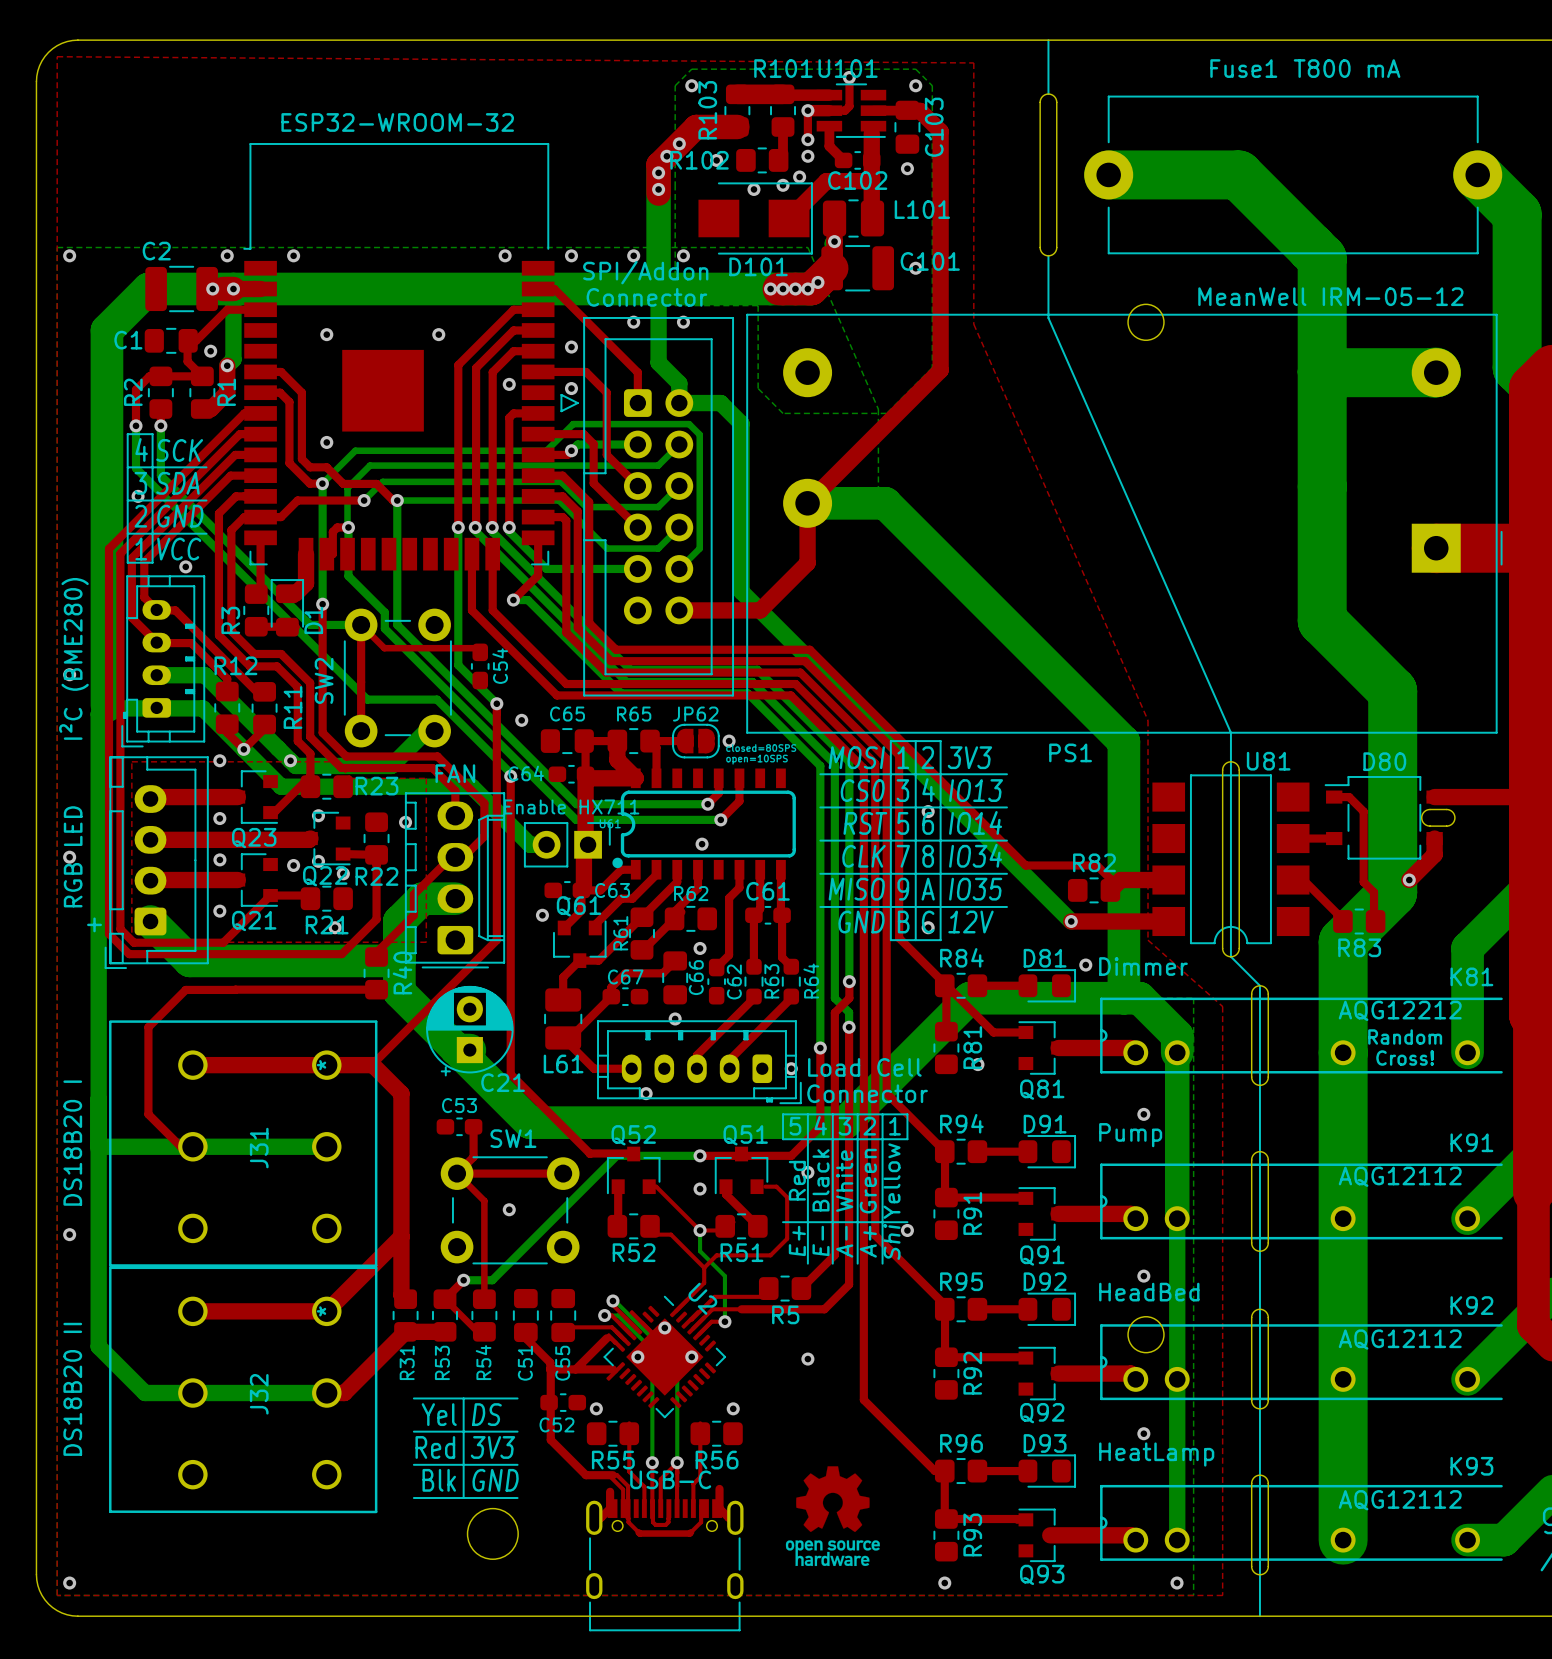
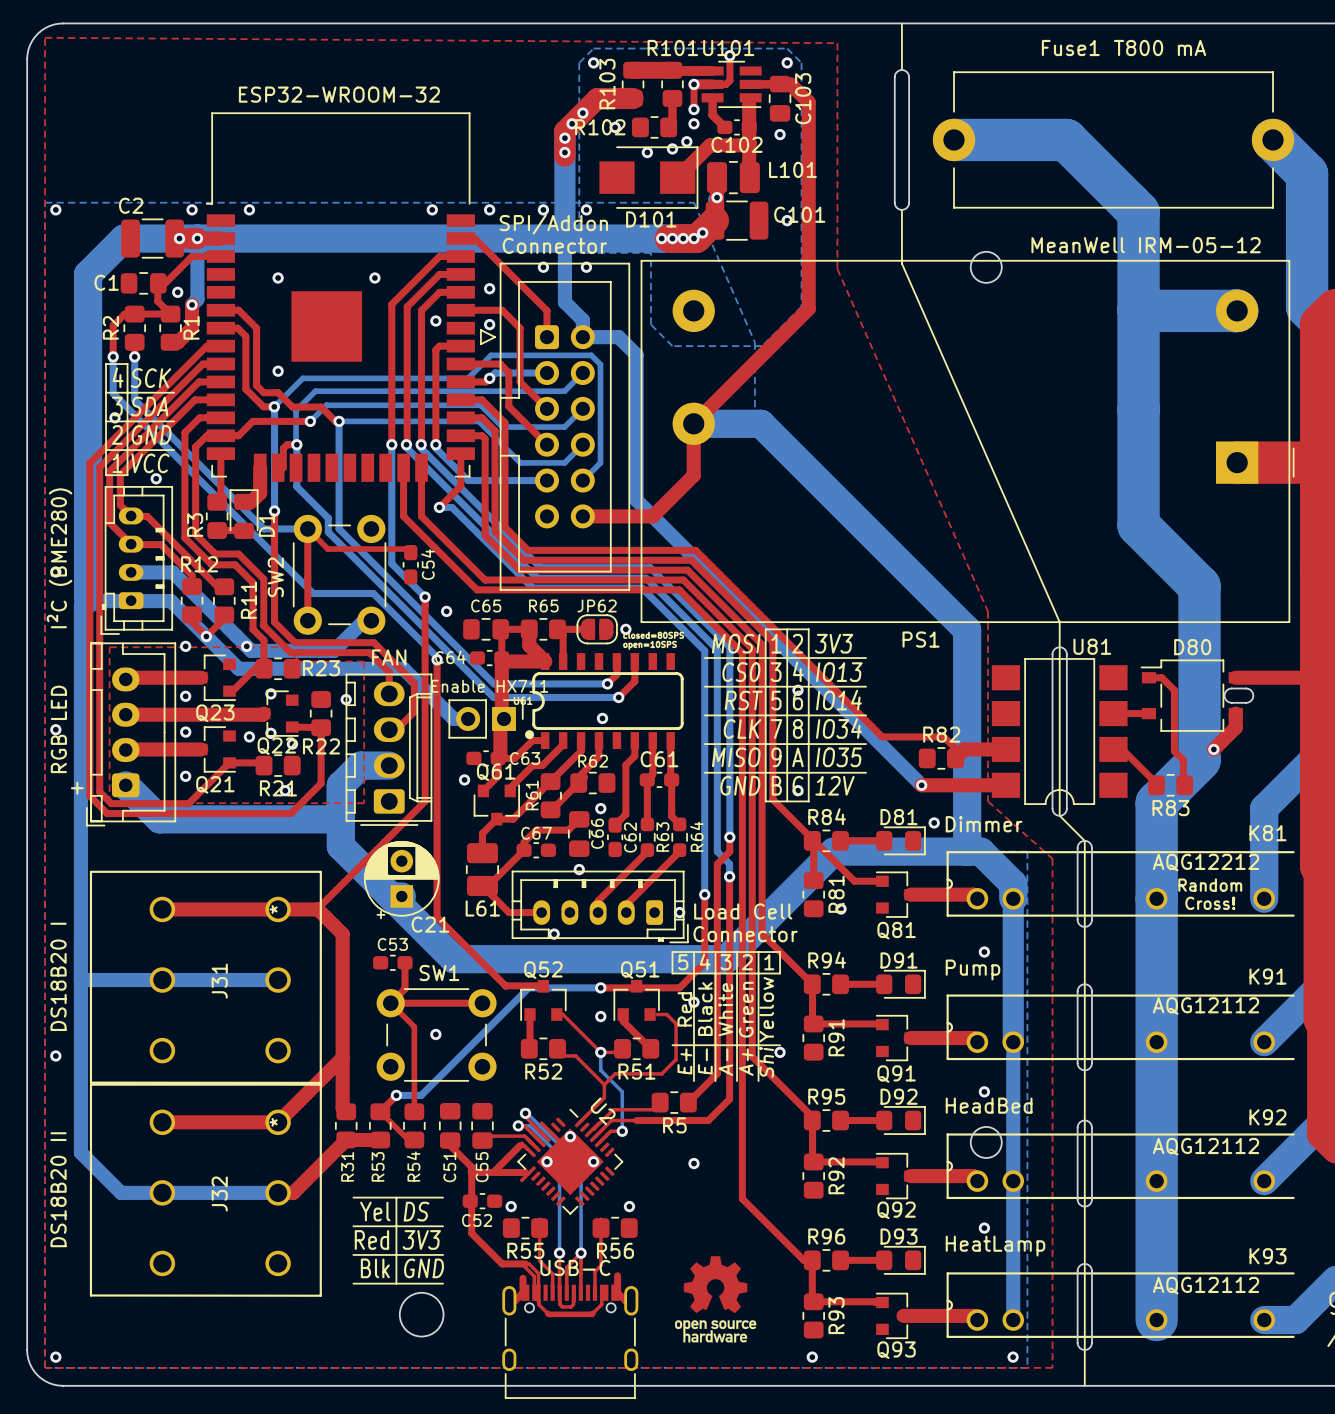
top track: (455, 857) (451, 857) (413, 894) (413, 915) (376, 952) (376, 957) -> none
R40: (376, 973) -> none
top track: (376, 989) (185, 989) (148, 1027) (148, 1114) (180, 1146) (192, 1146) -> none

